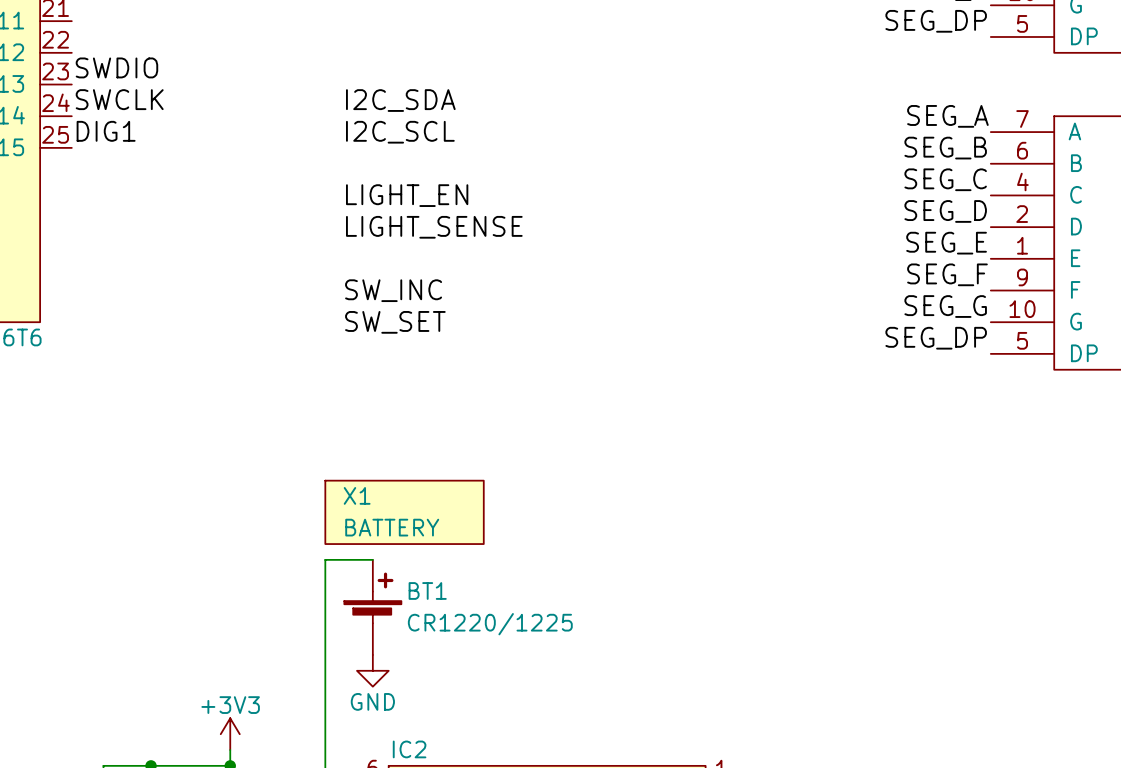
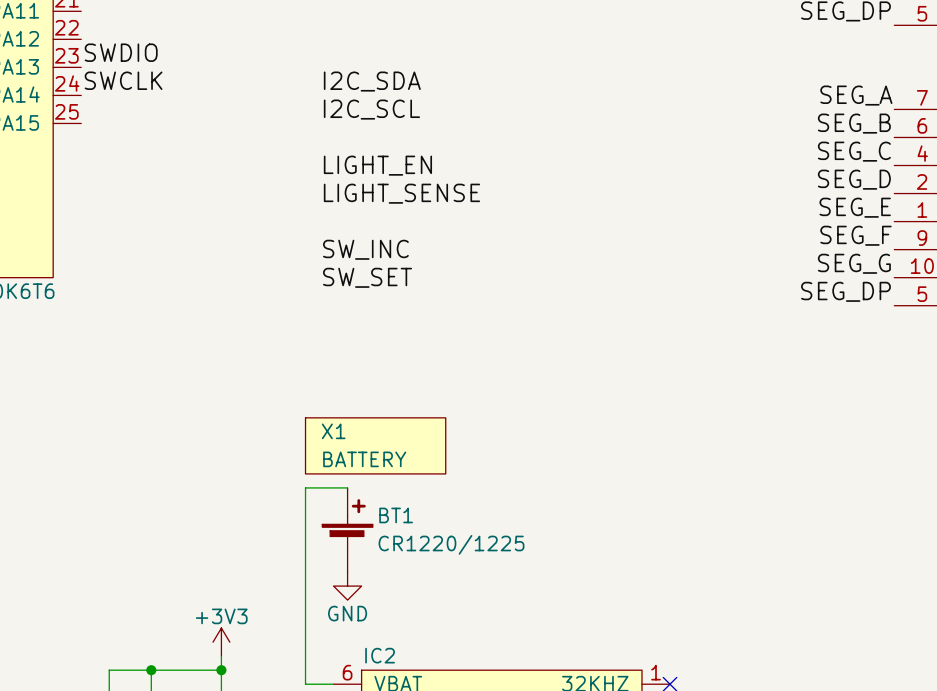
label: DIG1 (106, 131) -> none

